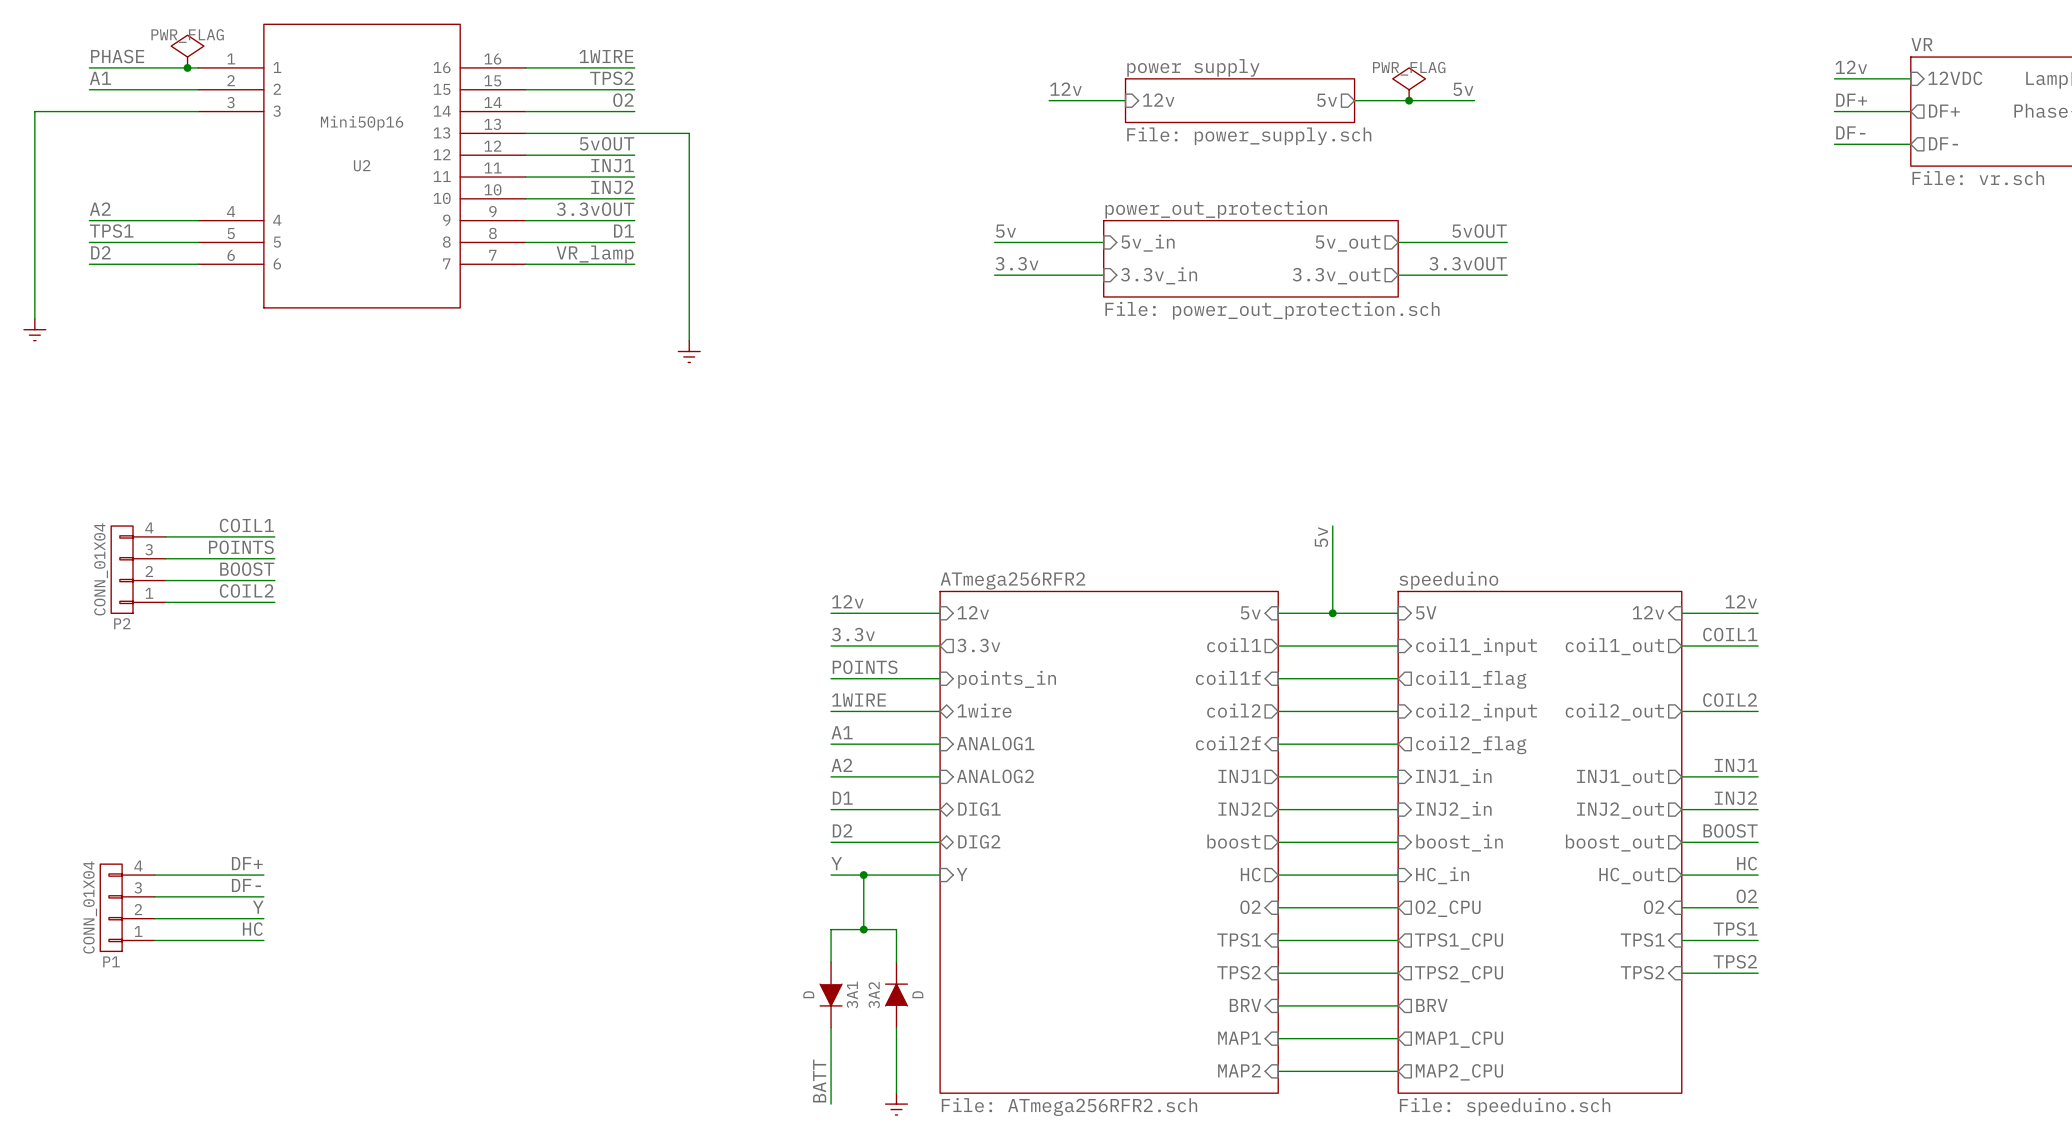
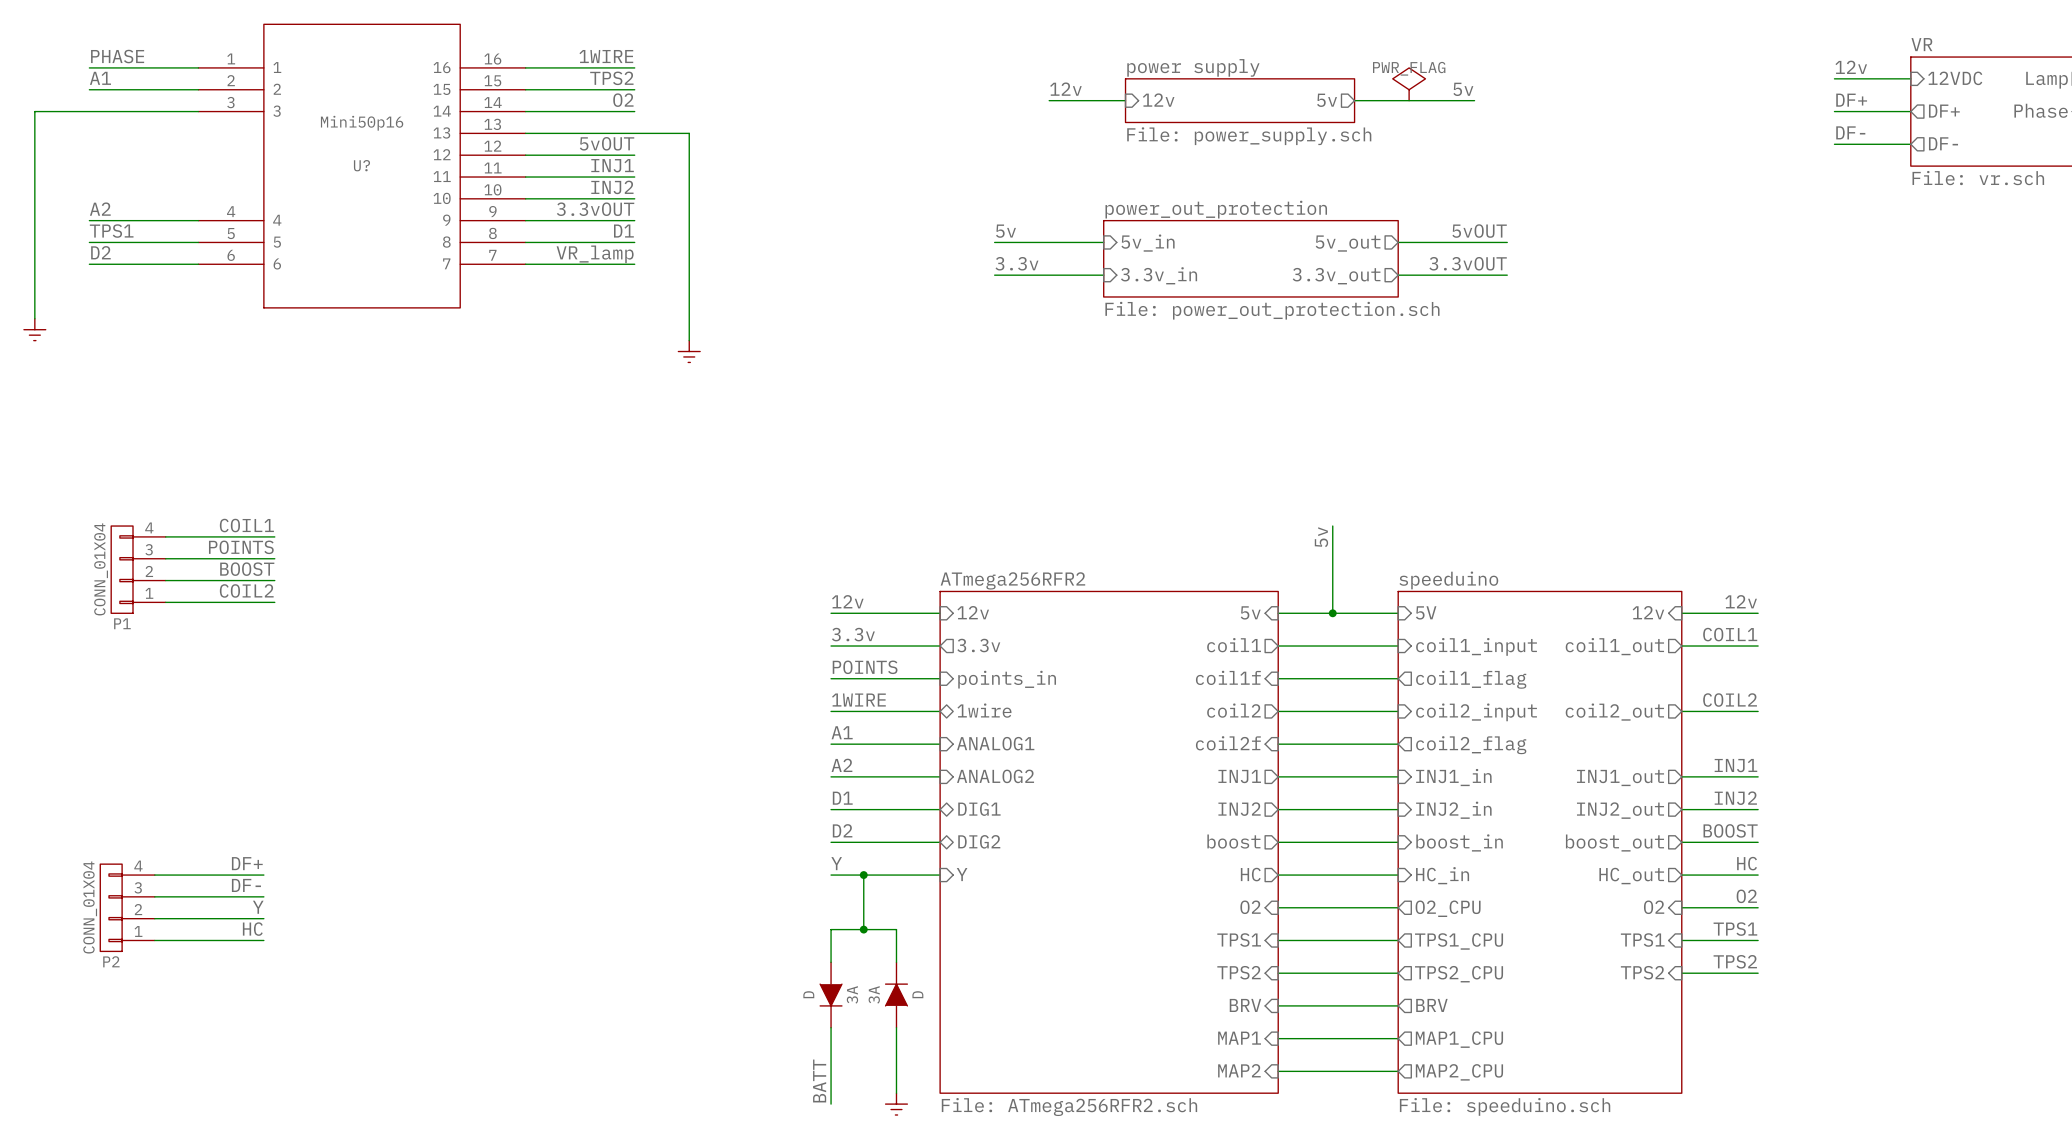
power symbol: PWR_FLAG (187, 51) -> none
junction: (187, 67) -> none
junction: (1409, 100) -> none
U2 name: U2 (362, 165) -> U? (361, 165)
P2 name: P2 (122, 623) -> P1 (122, 623)
P1 name: P1 (111, 961) -> P2 (111, 961)
3A1 name: 3A1 (852, 995) -> 3A (852, 994)
3A2 name: 3A2 (874, 995) -> 3A (874, 994)

